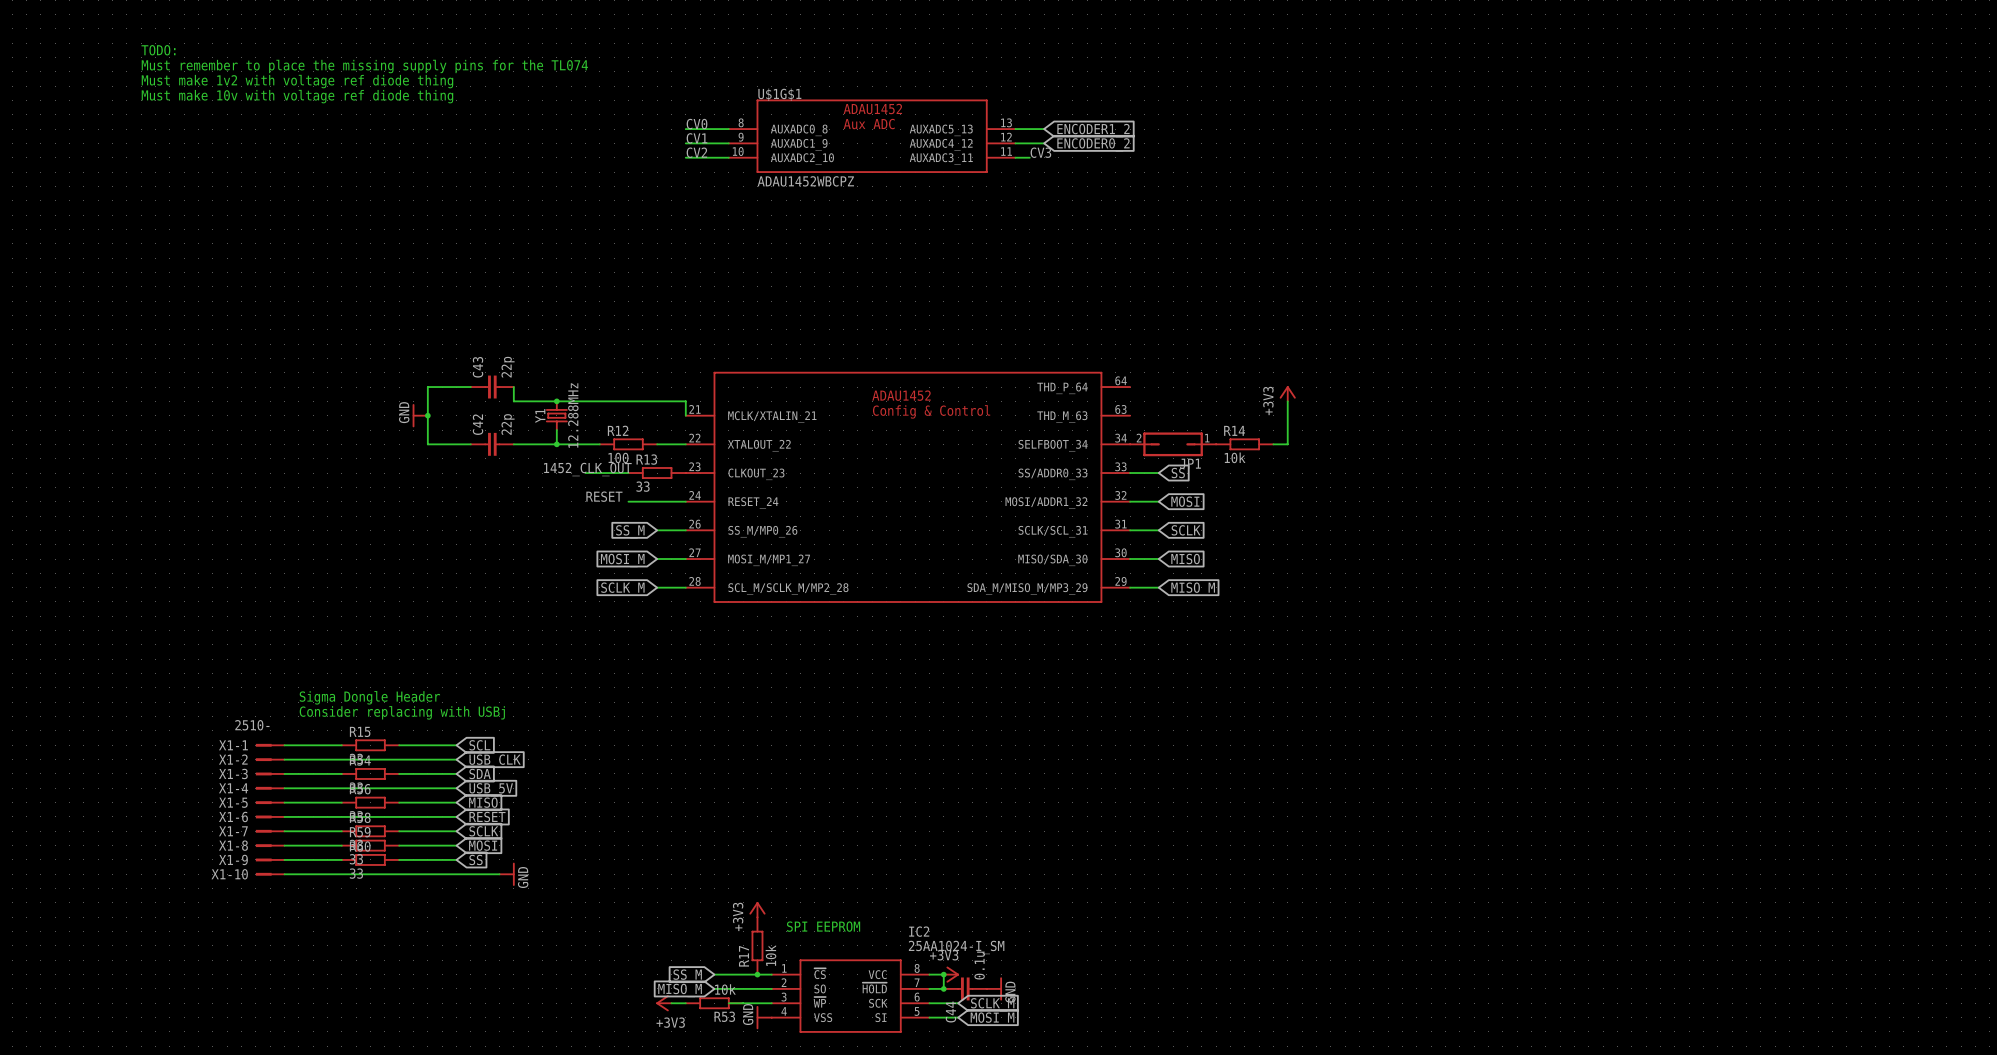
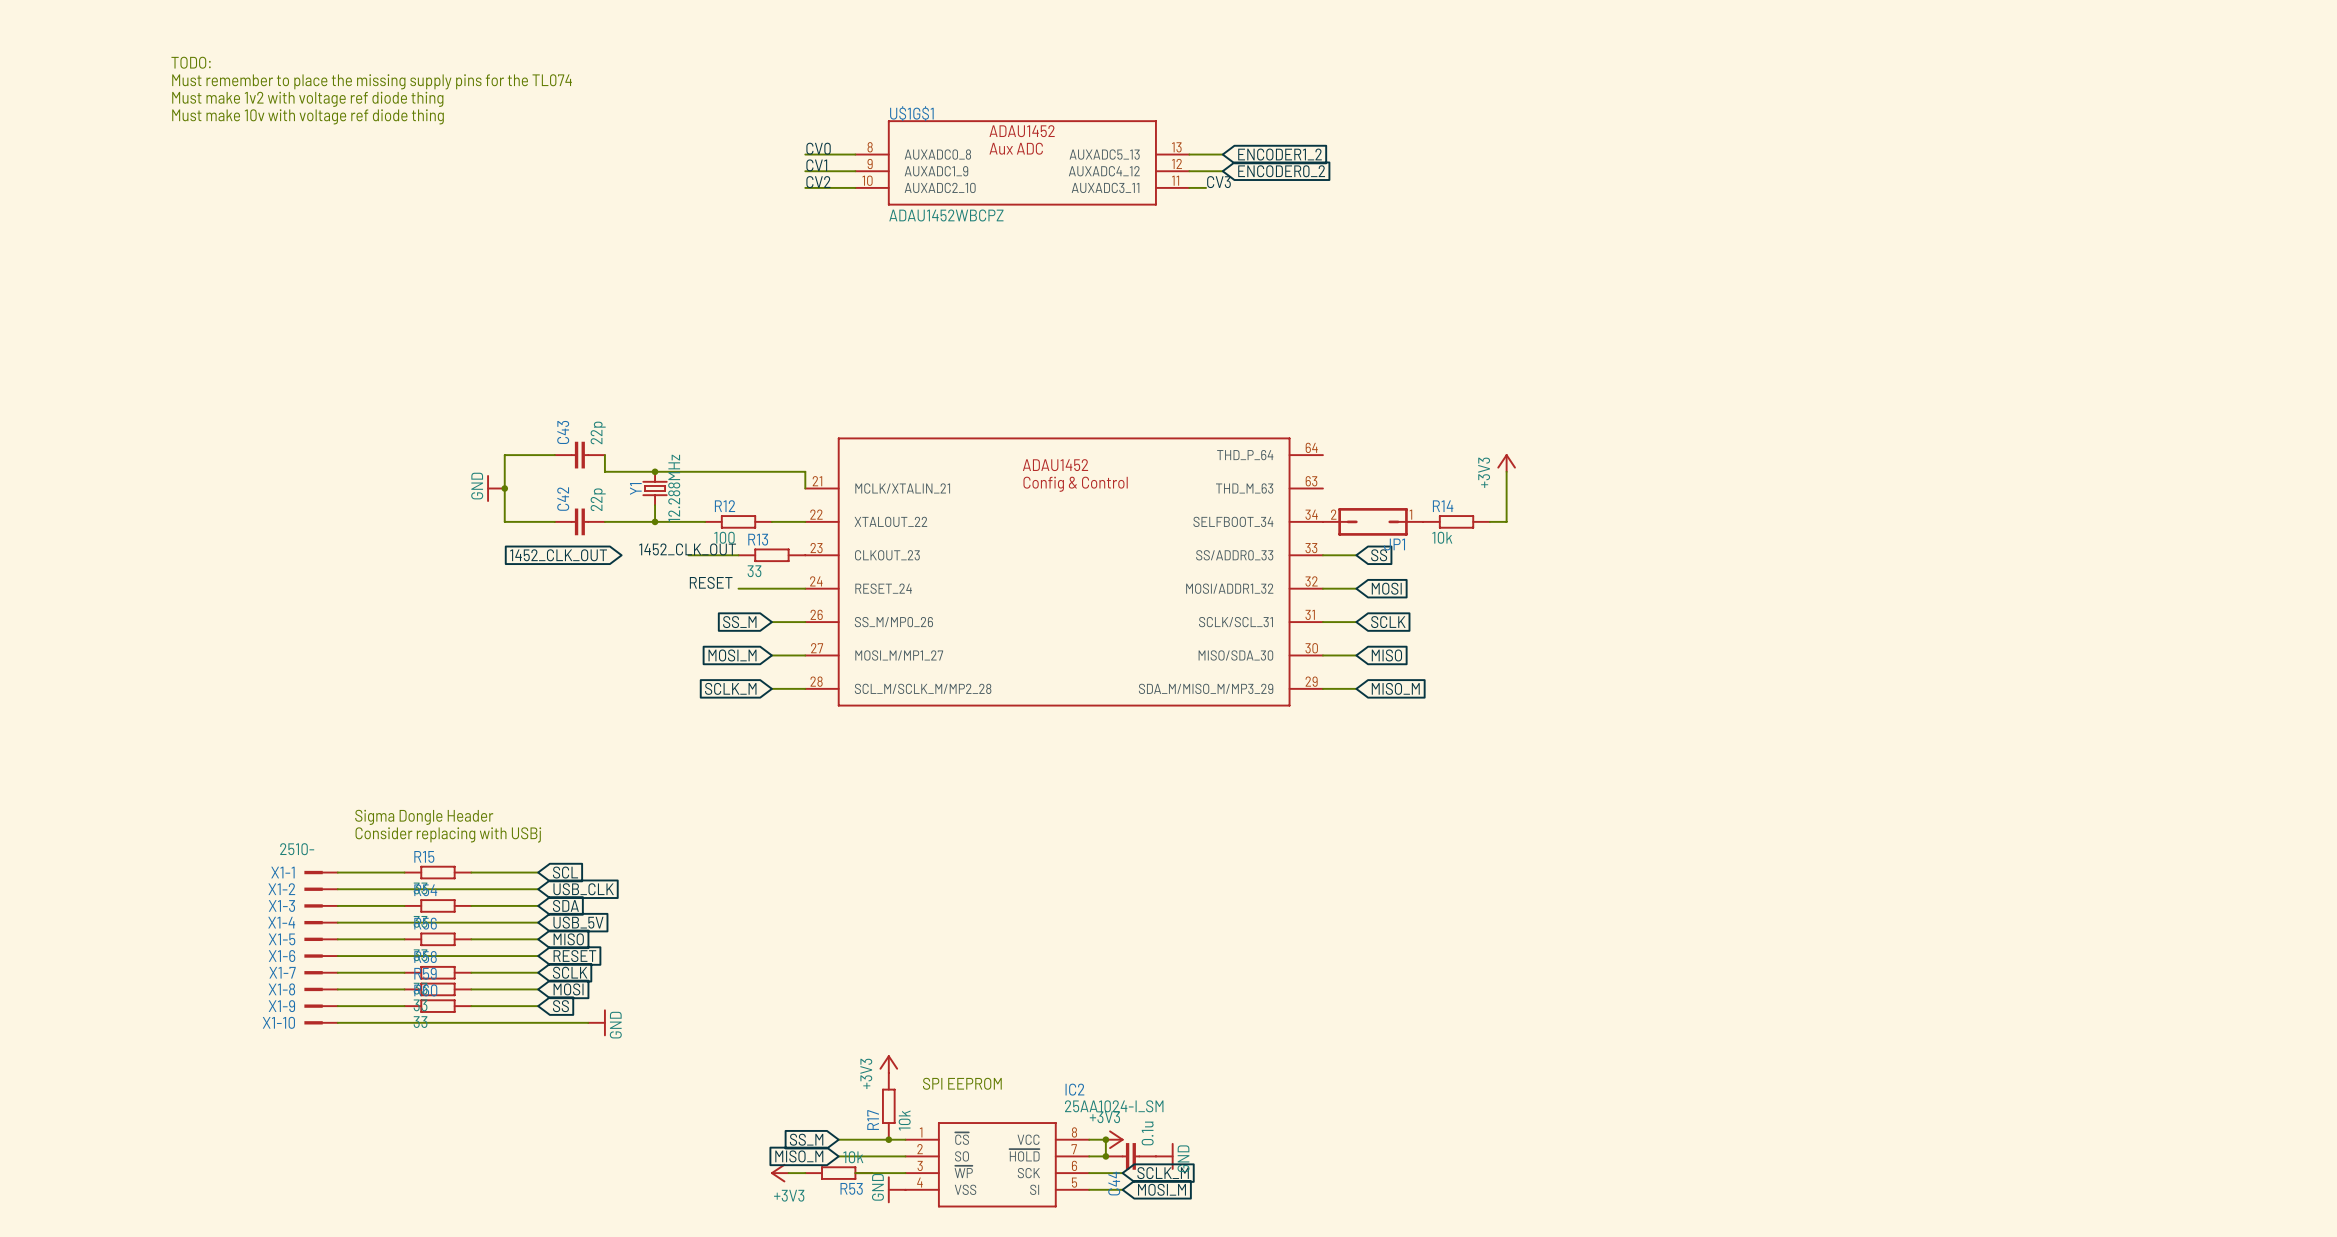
global label: none -> 1452_CLK_OUT (558, 555)

